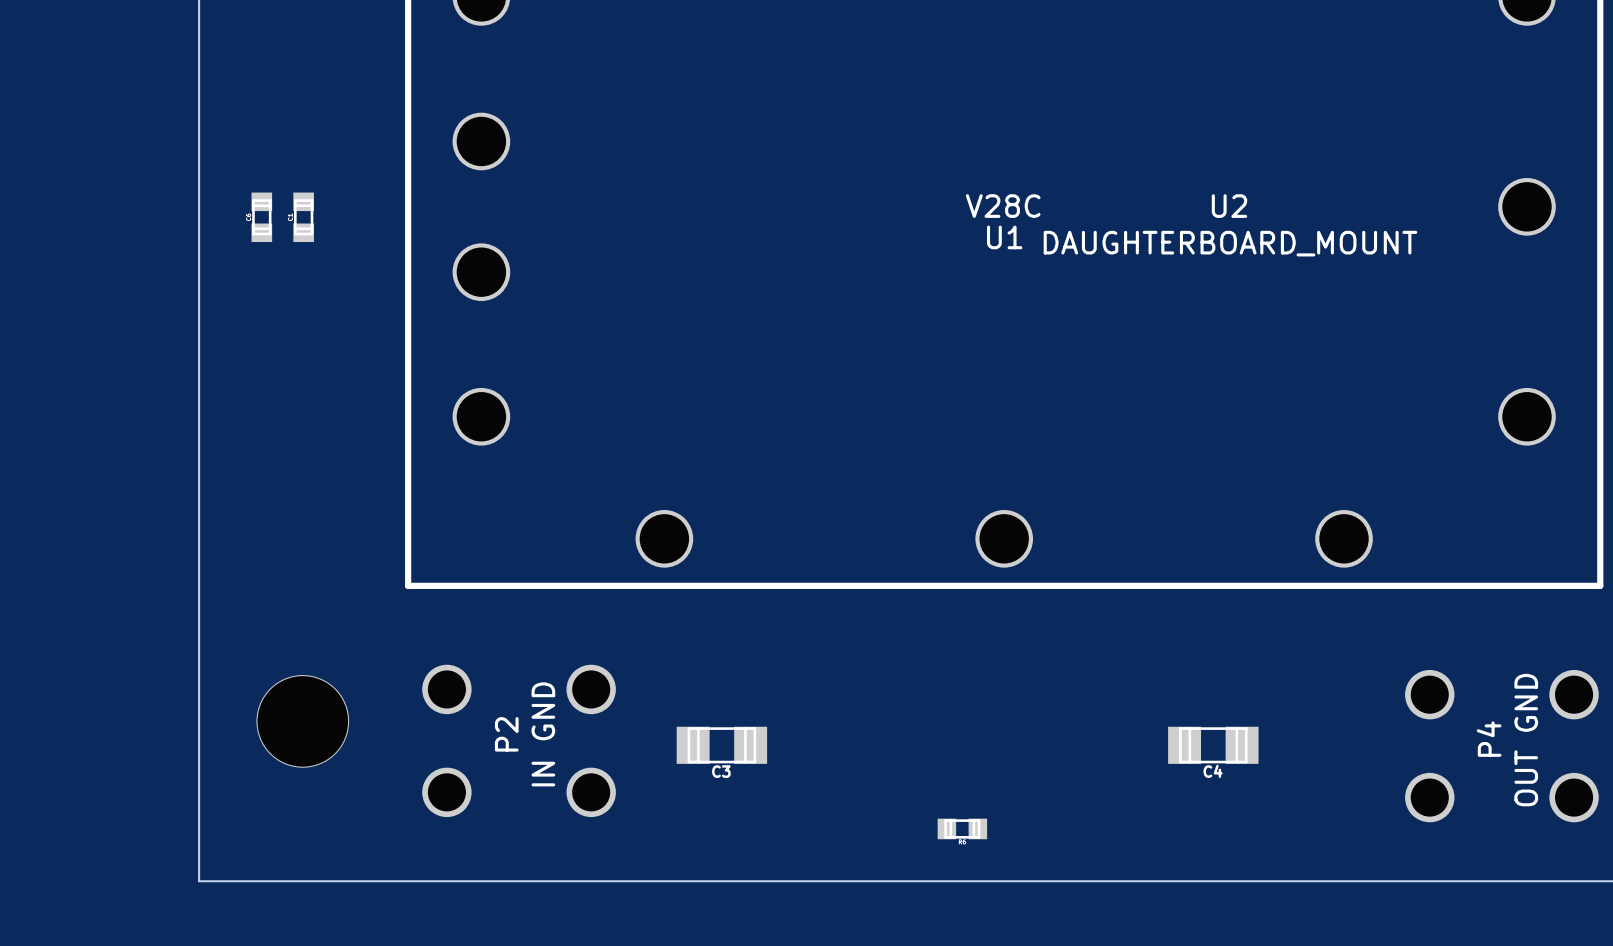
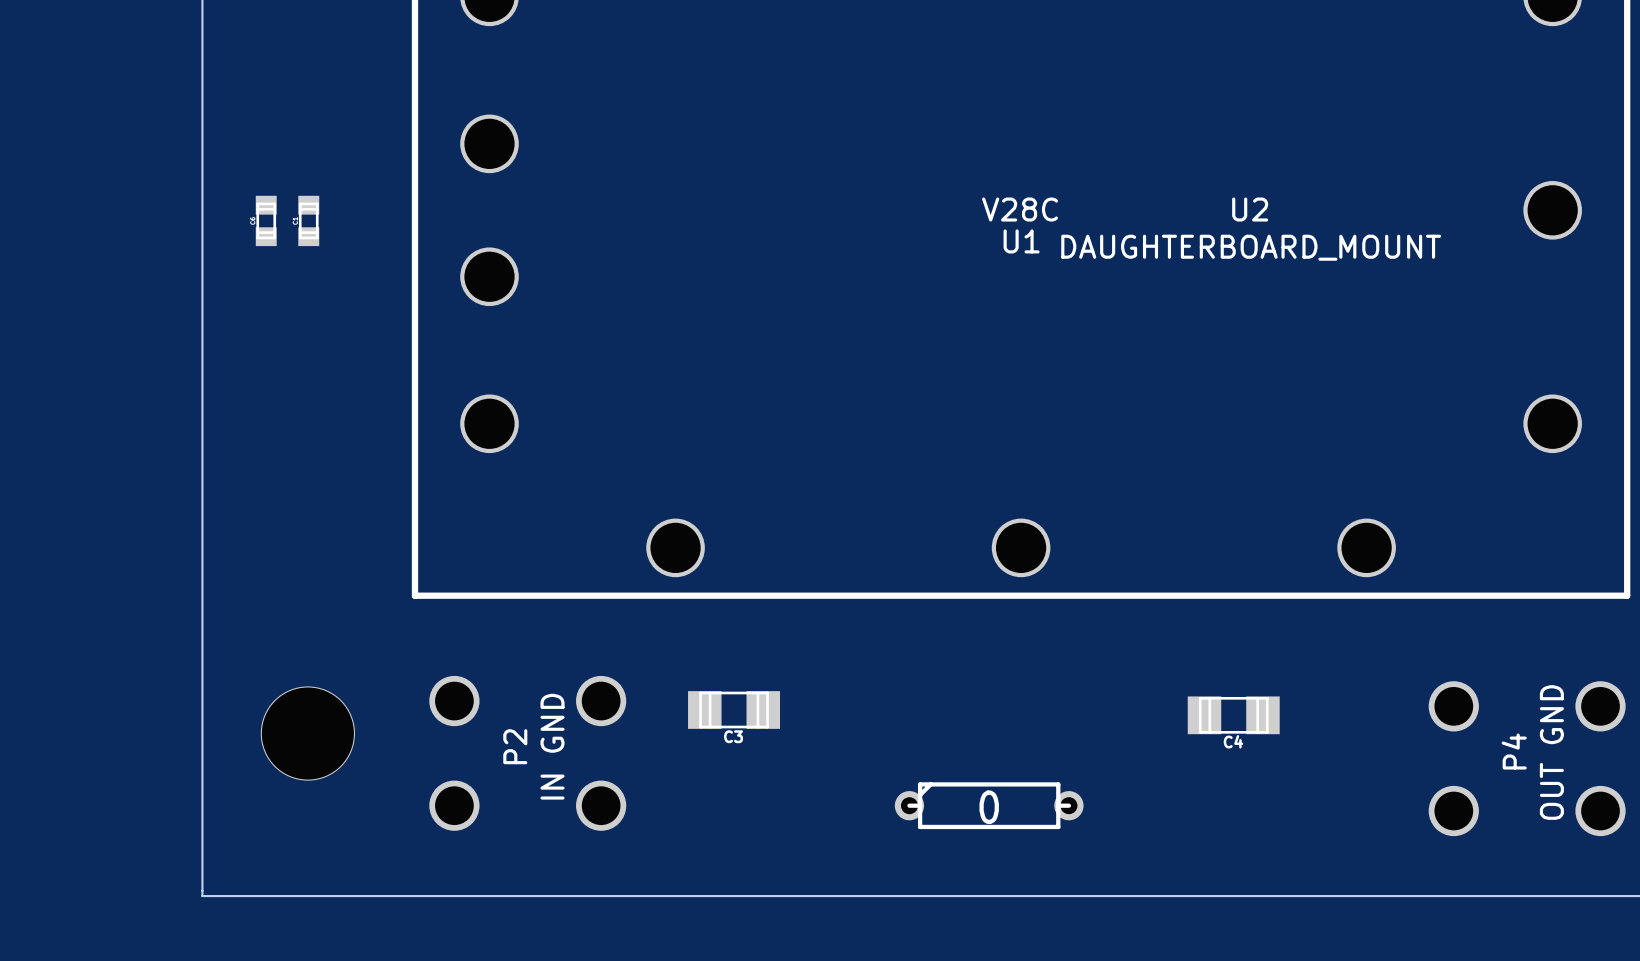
C3 position: (721, 745) -> (734, 710)
C4 position: (1213, 745) -> (1233, 715)
part: none -> 0 (989, 805)
part: (962, 828) -> none

